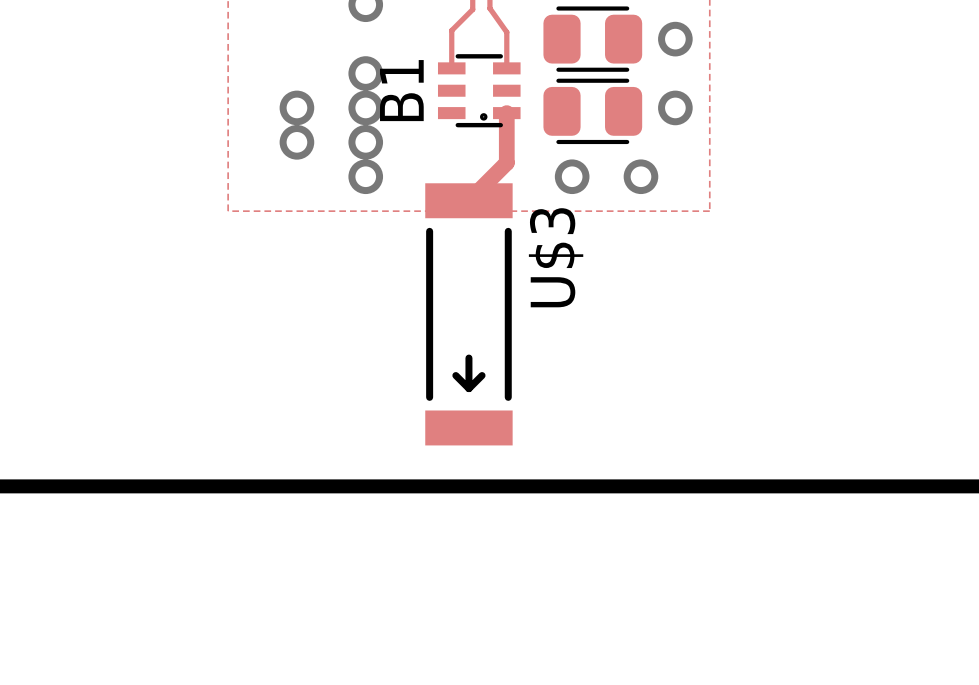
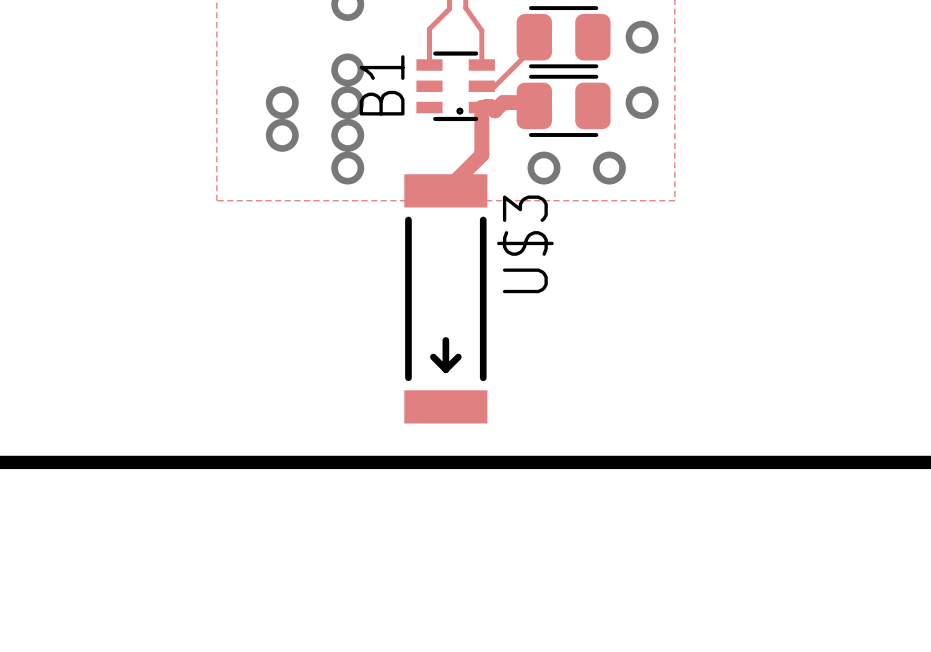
top track: none -> (534, 37) (531, 37) (531, 49) (494, 86) (481, 86)
top track: none -> (534, 105) (531, 102) (503, 102) (494, 110) (490, 106) (481, 107)

